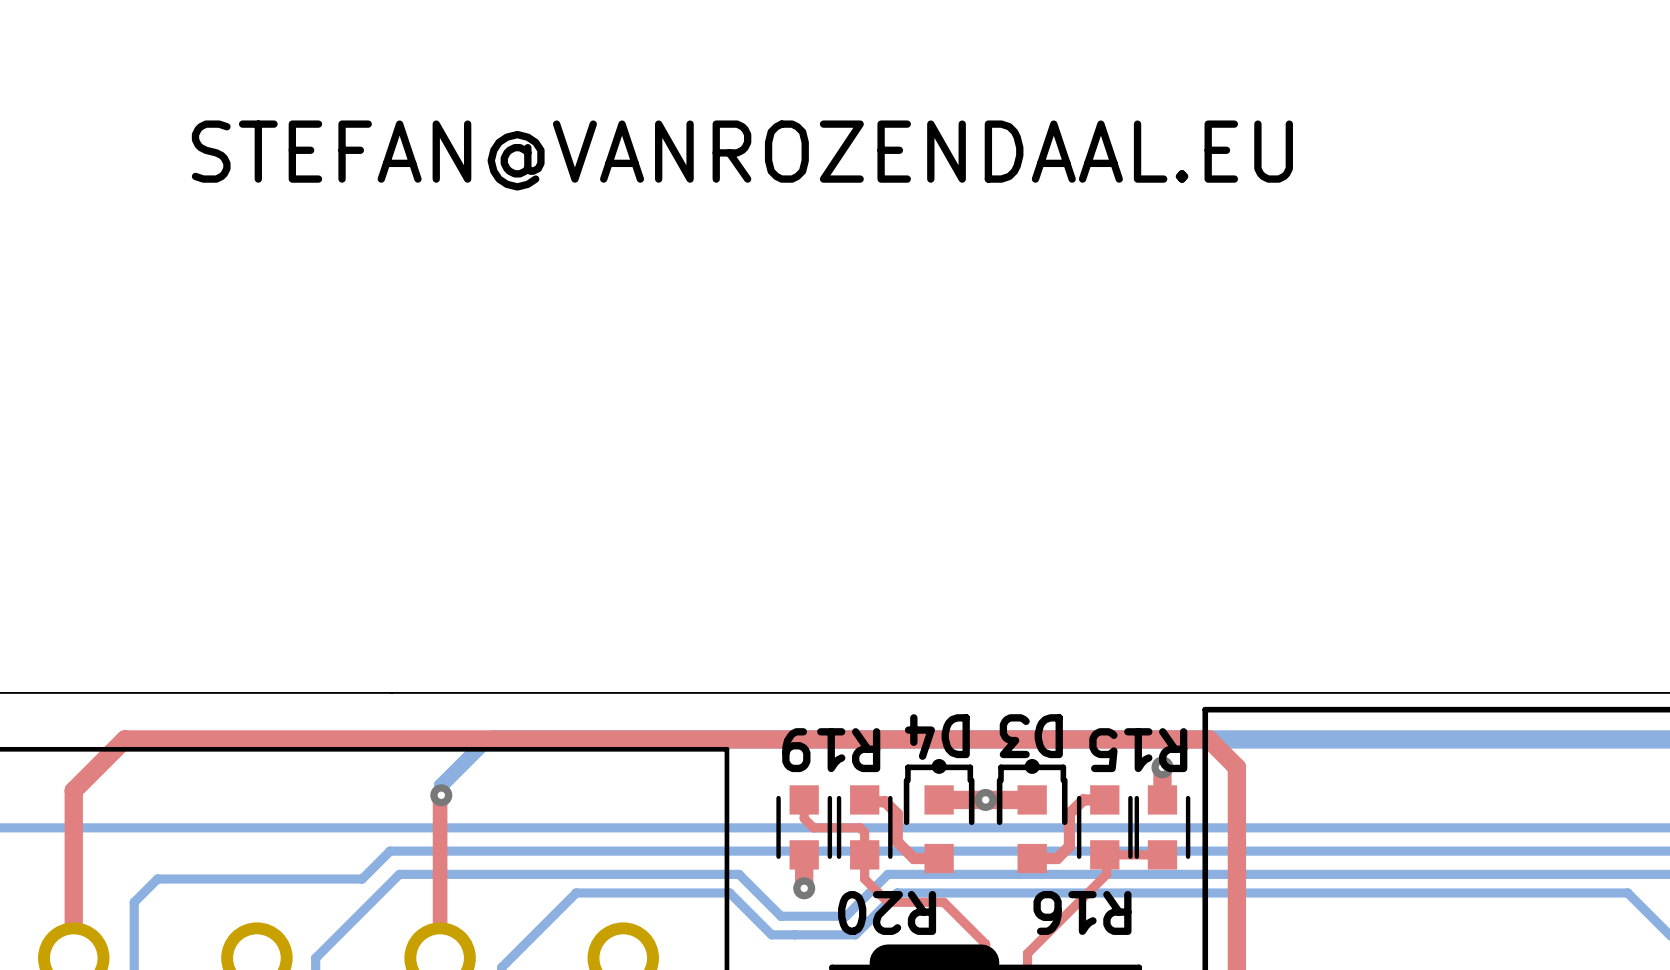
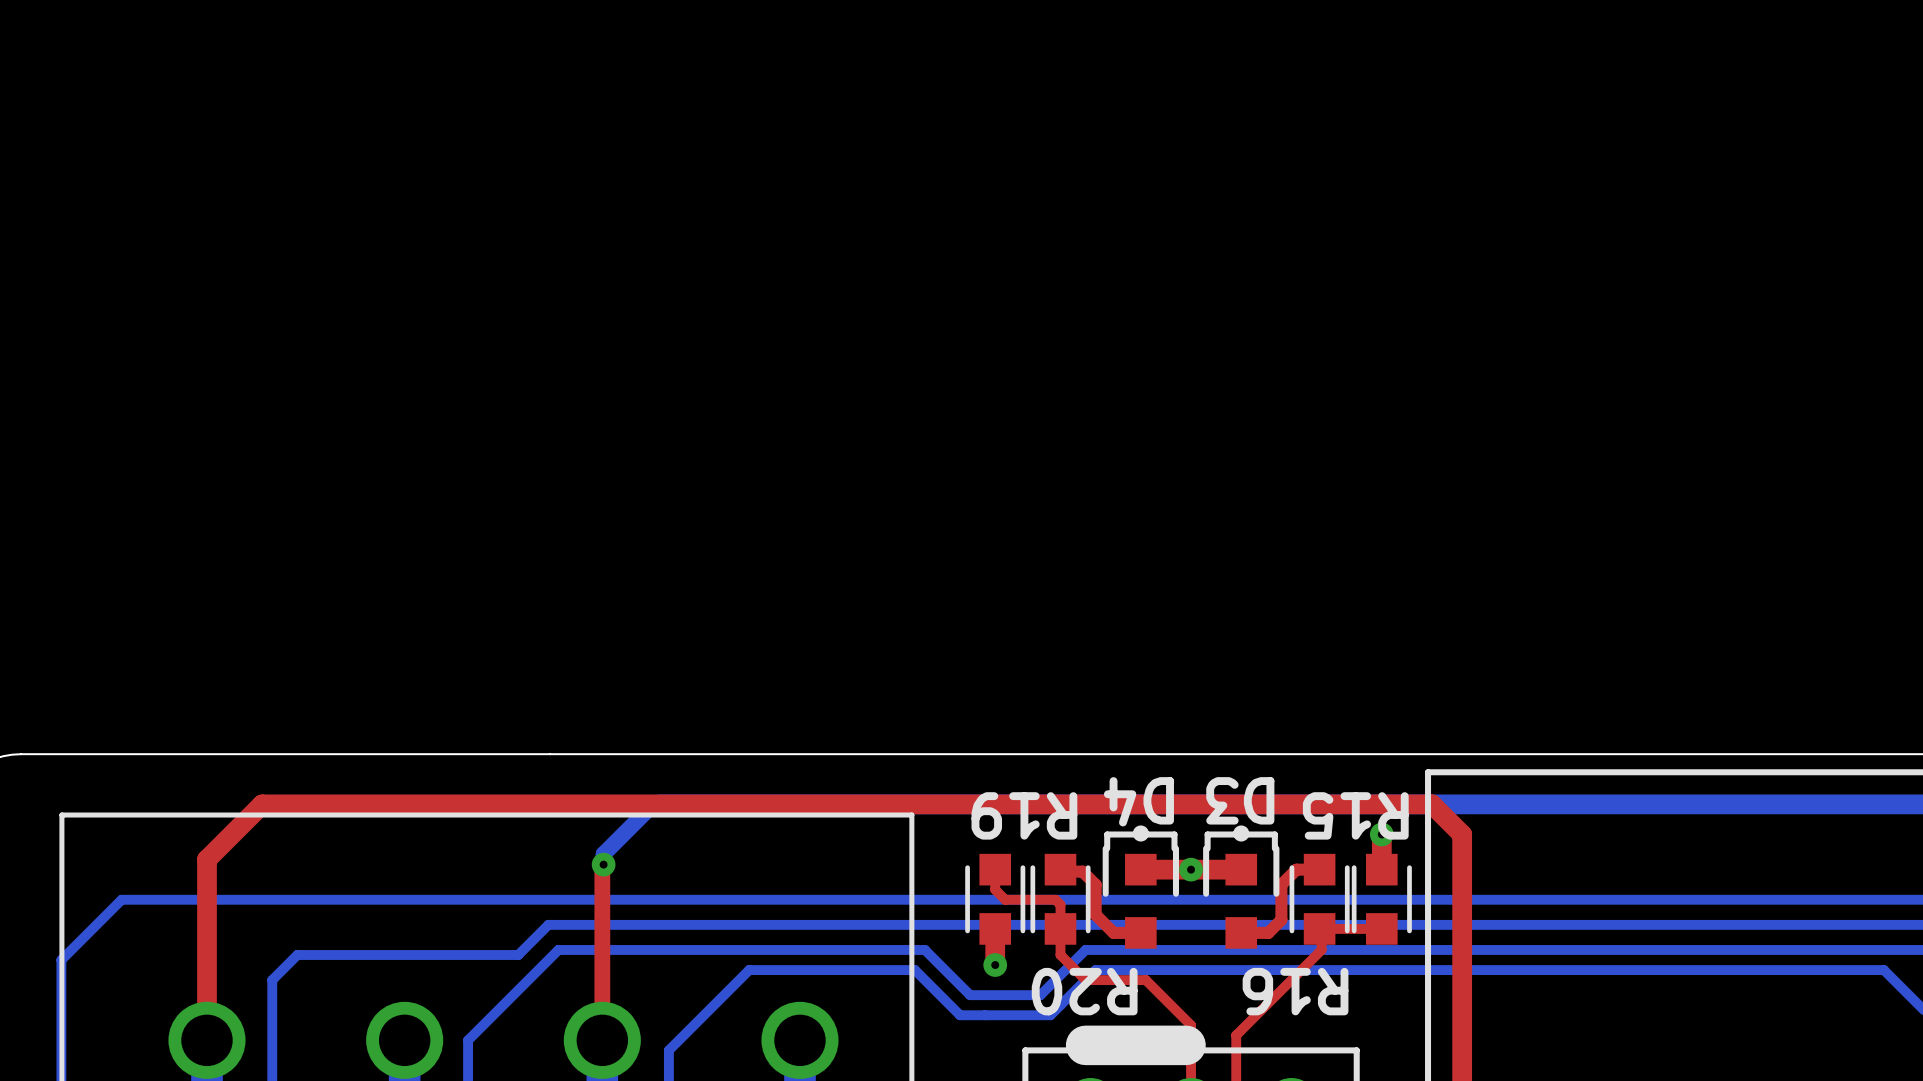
text: STEFAN@VANROZENDAAL.EU (742, 155) -> none

